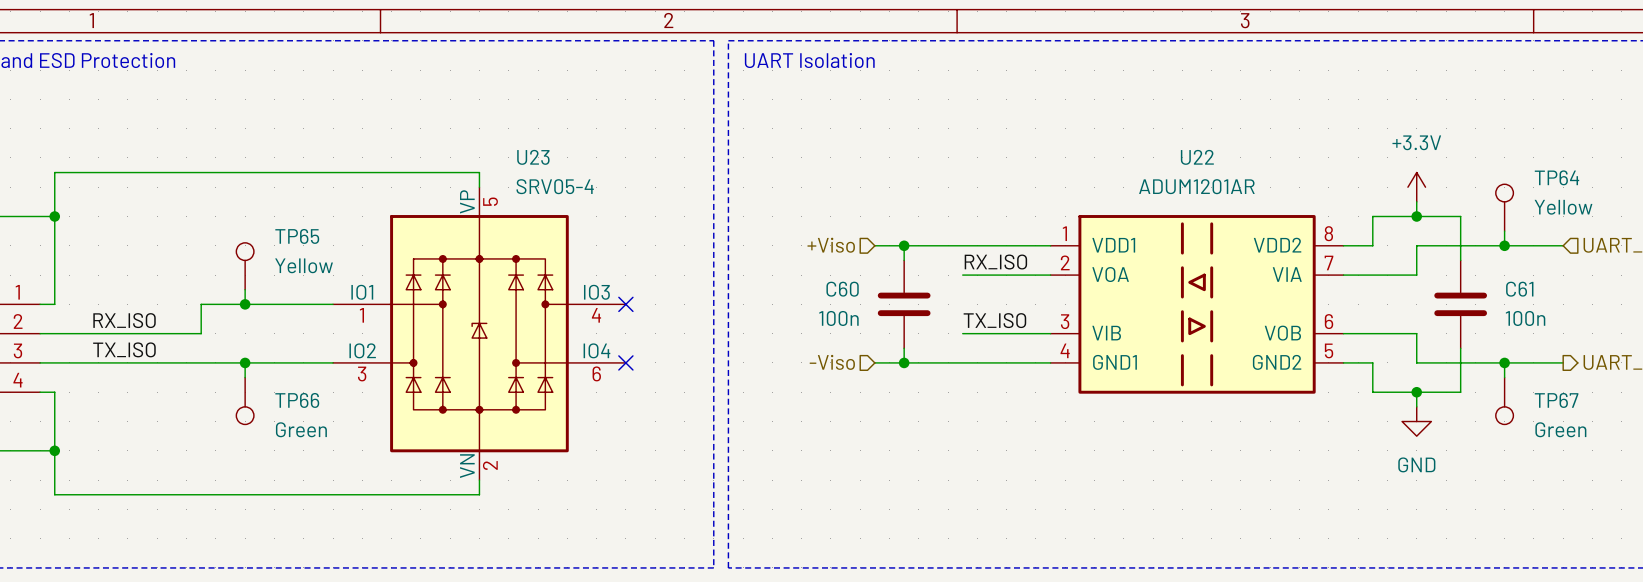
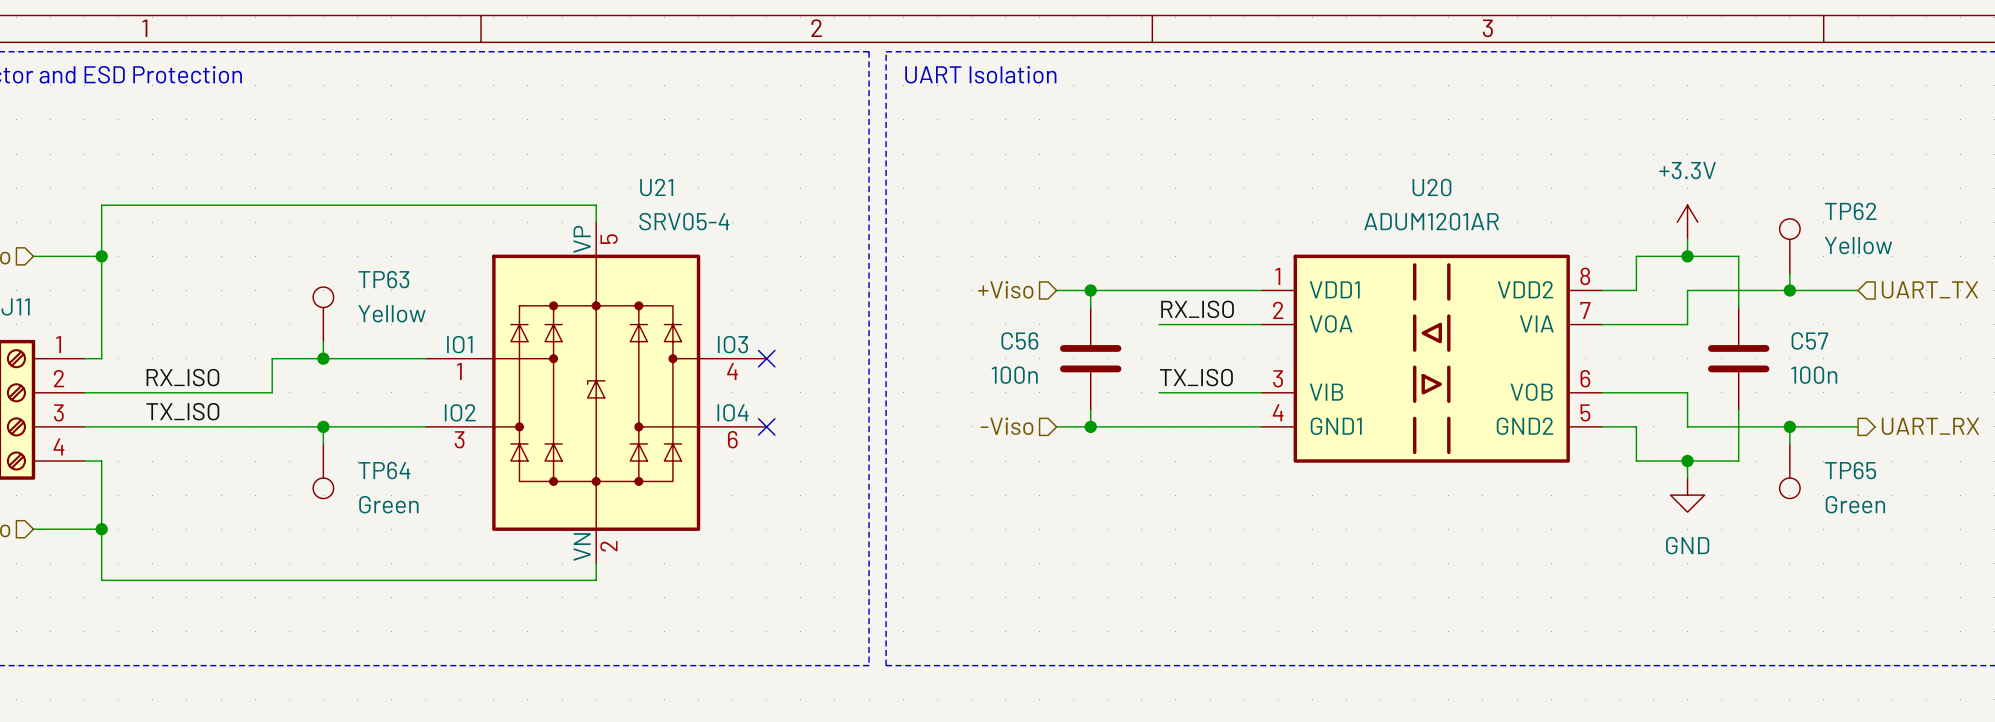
U23 name: U23 (533, 157) -> U21 (656, 187)
U22 name: U22 (1197, 157) -> U20 (1431, 187)
TP64 name: TP64 (1556, 177) -> TP62 (1850, 211)
TP65 name: TP65 (297, 236) -> TP63 (383, 279)
C60 name: C60 (842, 289) -> C56 (1019, 341)
C61 name: C61 (1519, 289) -> C57 (1809, 341)
TP66 name: TP66 (297, 400) -> TP64 (384, 470)
TP67 name: TP67 (1556, 400) -> TP65 (1850, 470)

